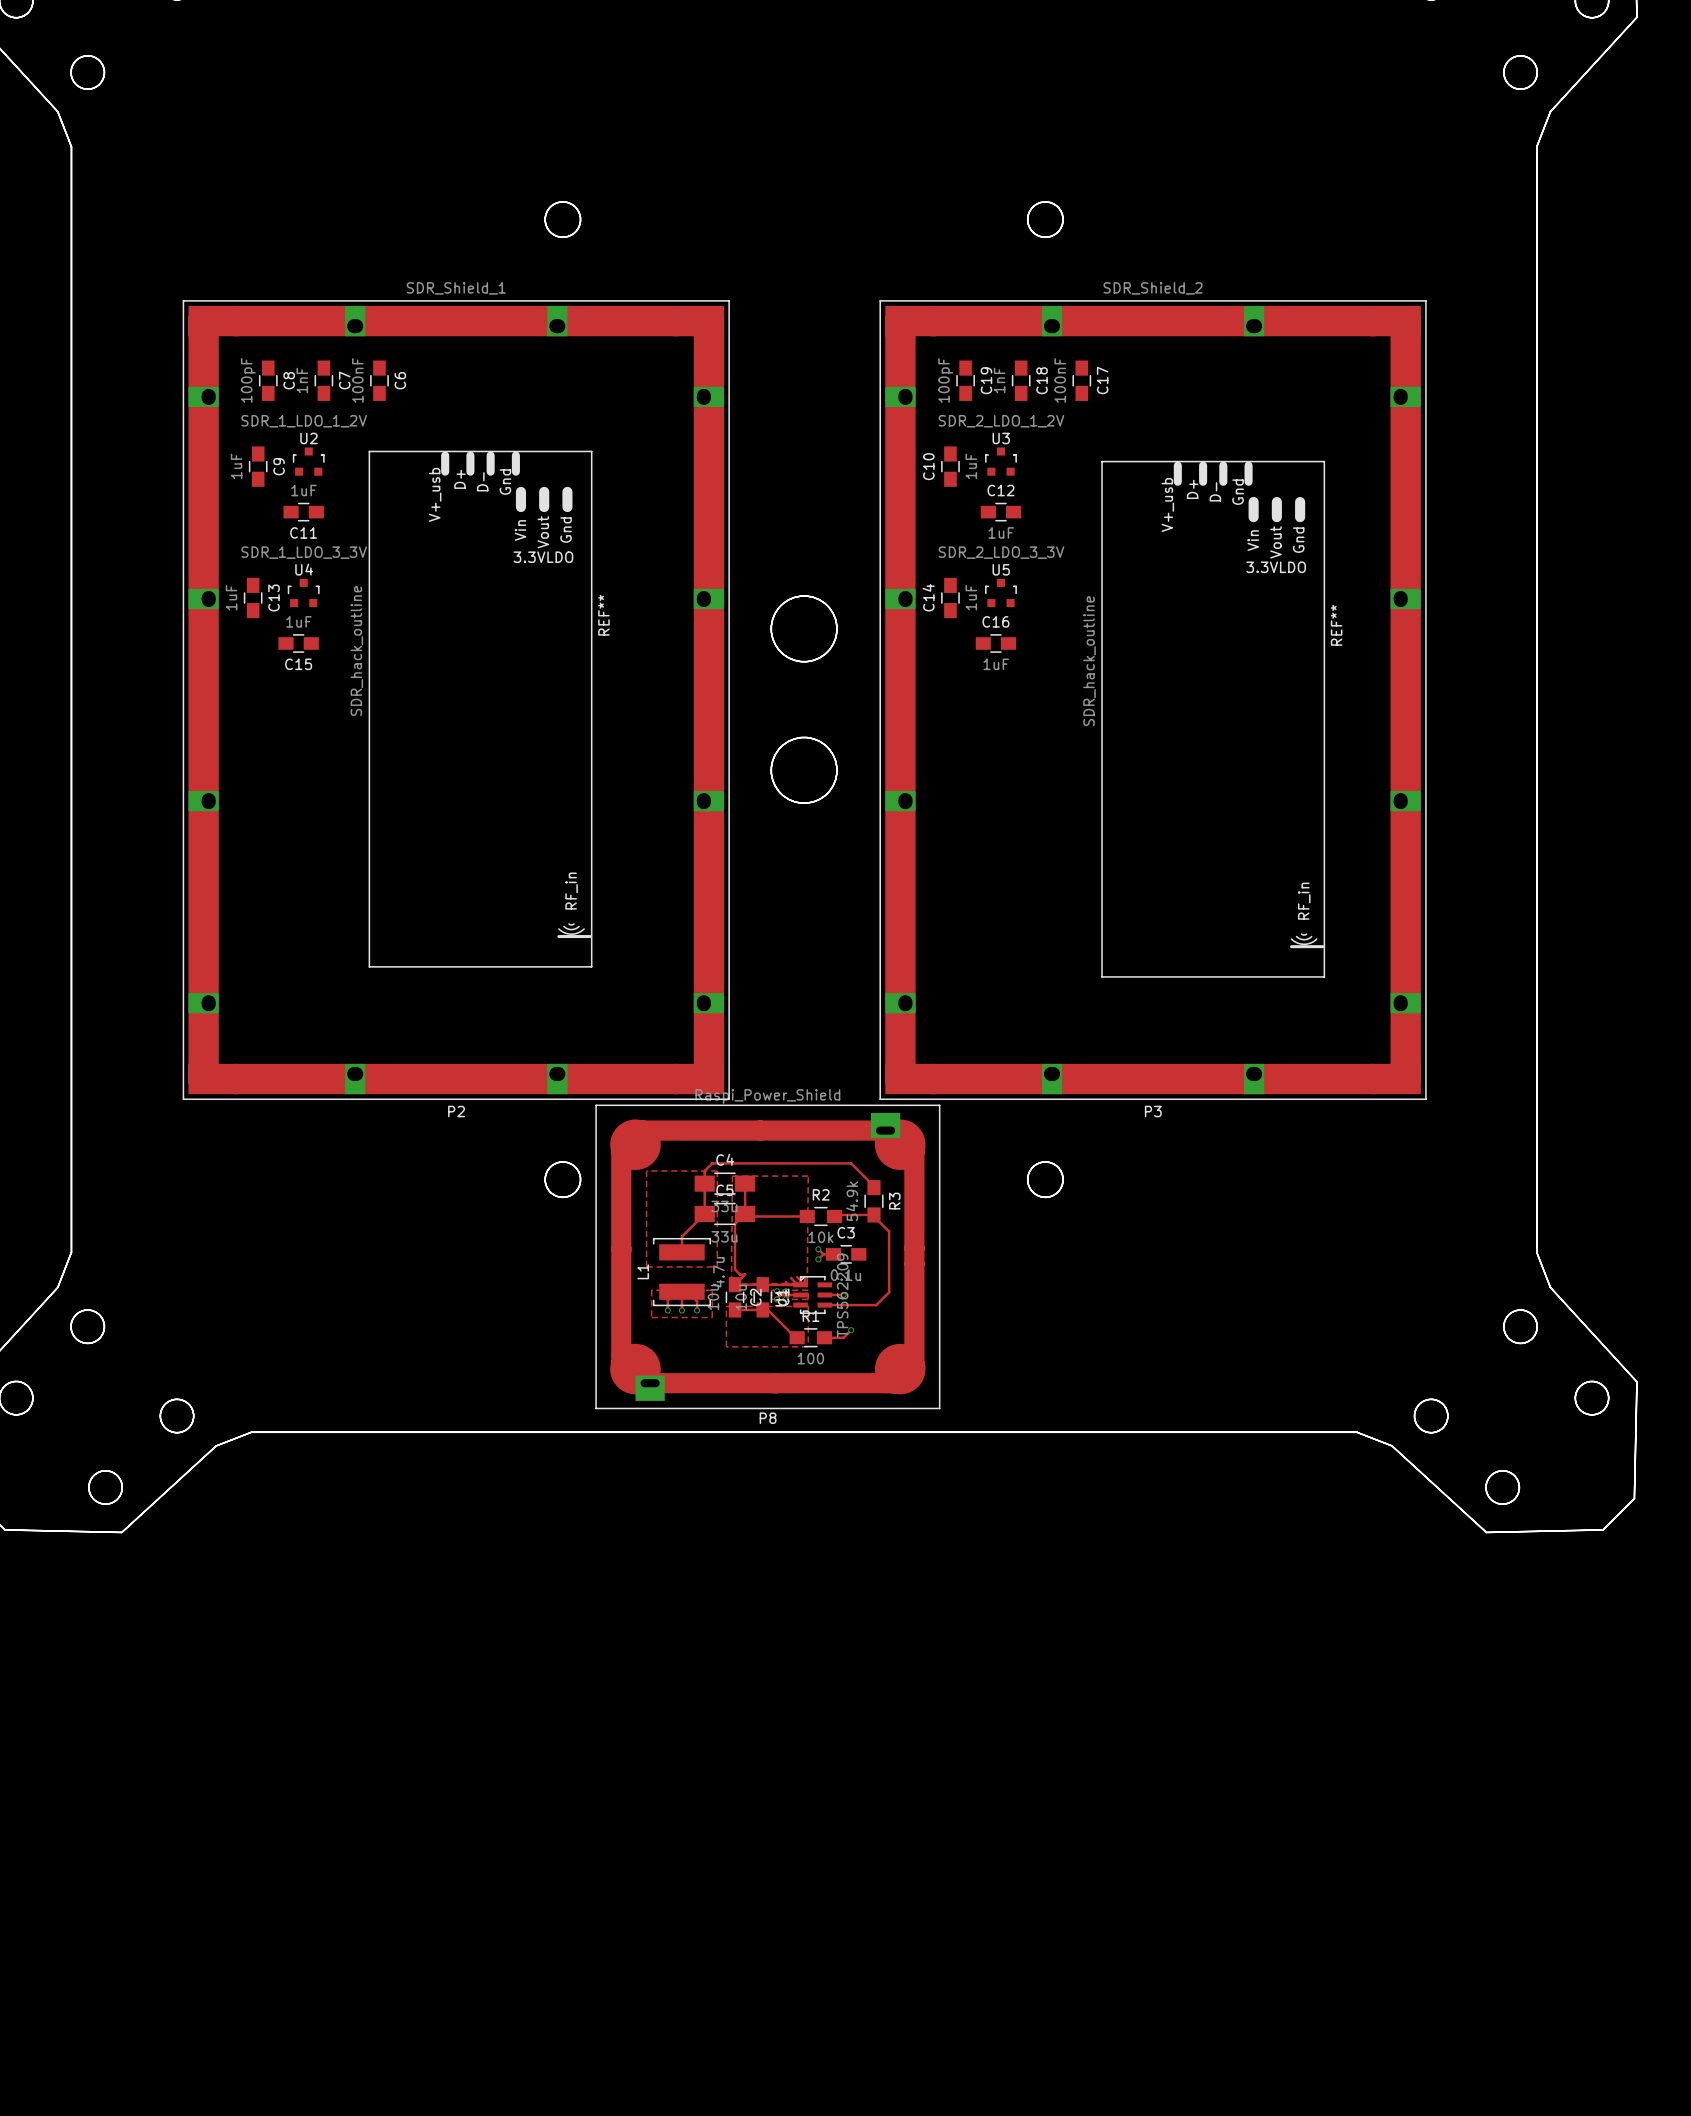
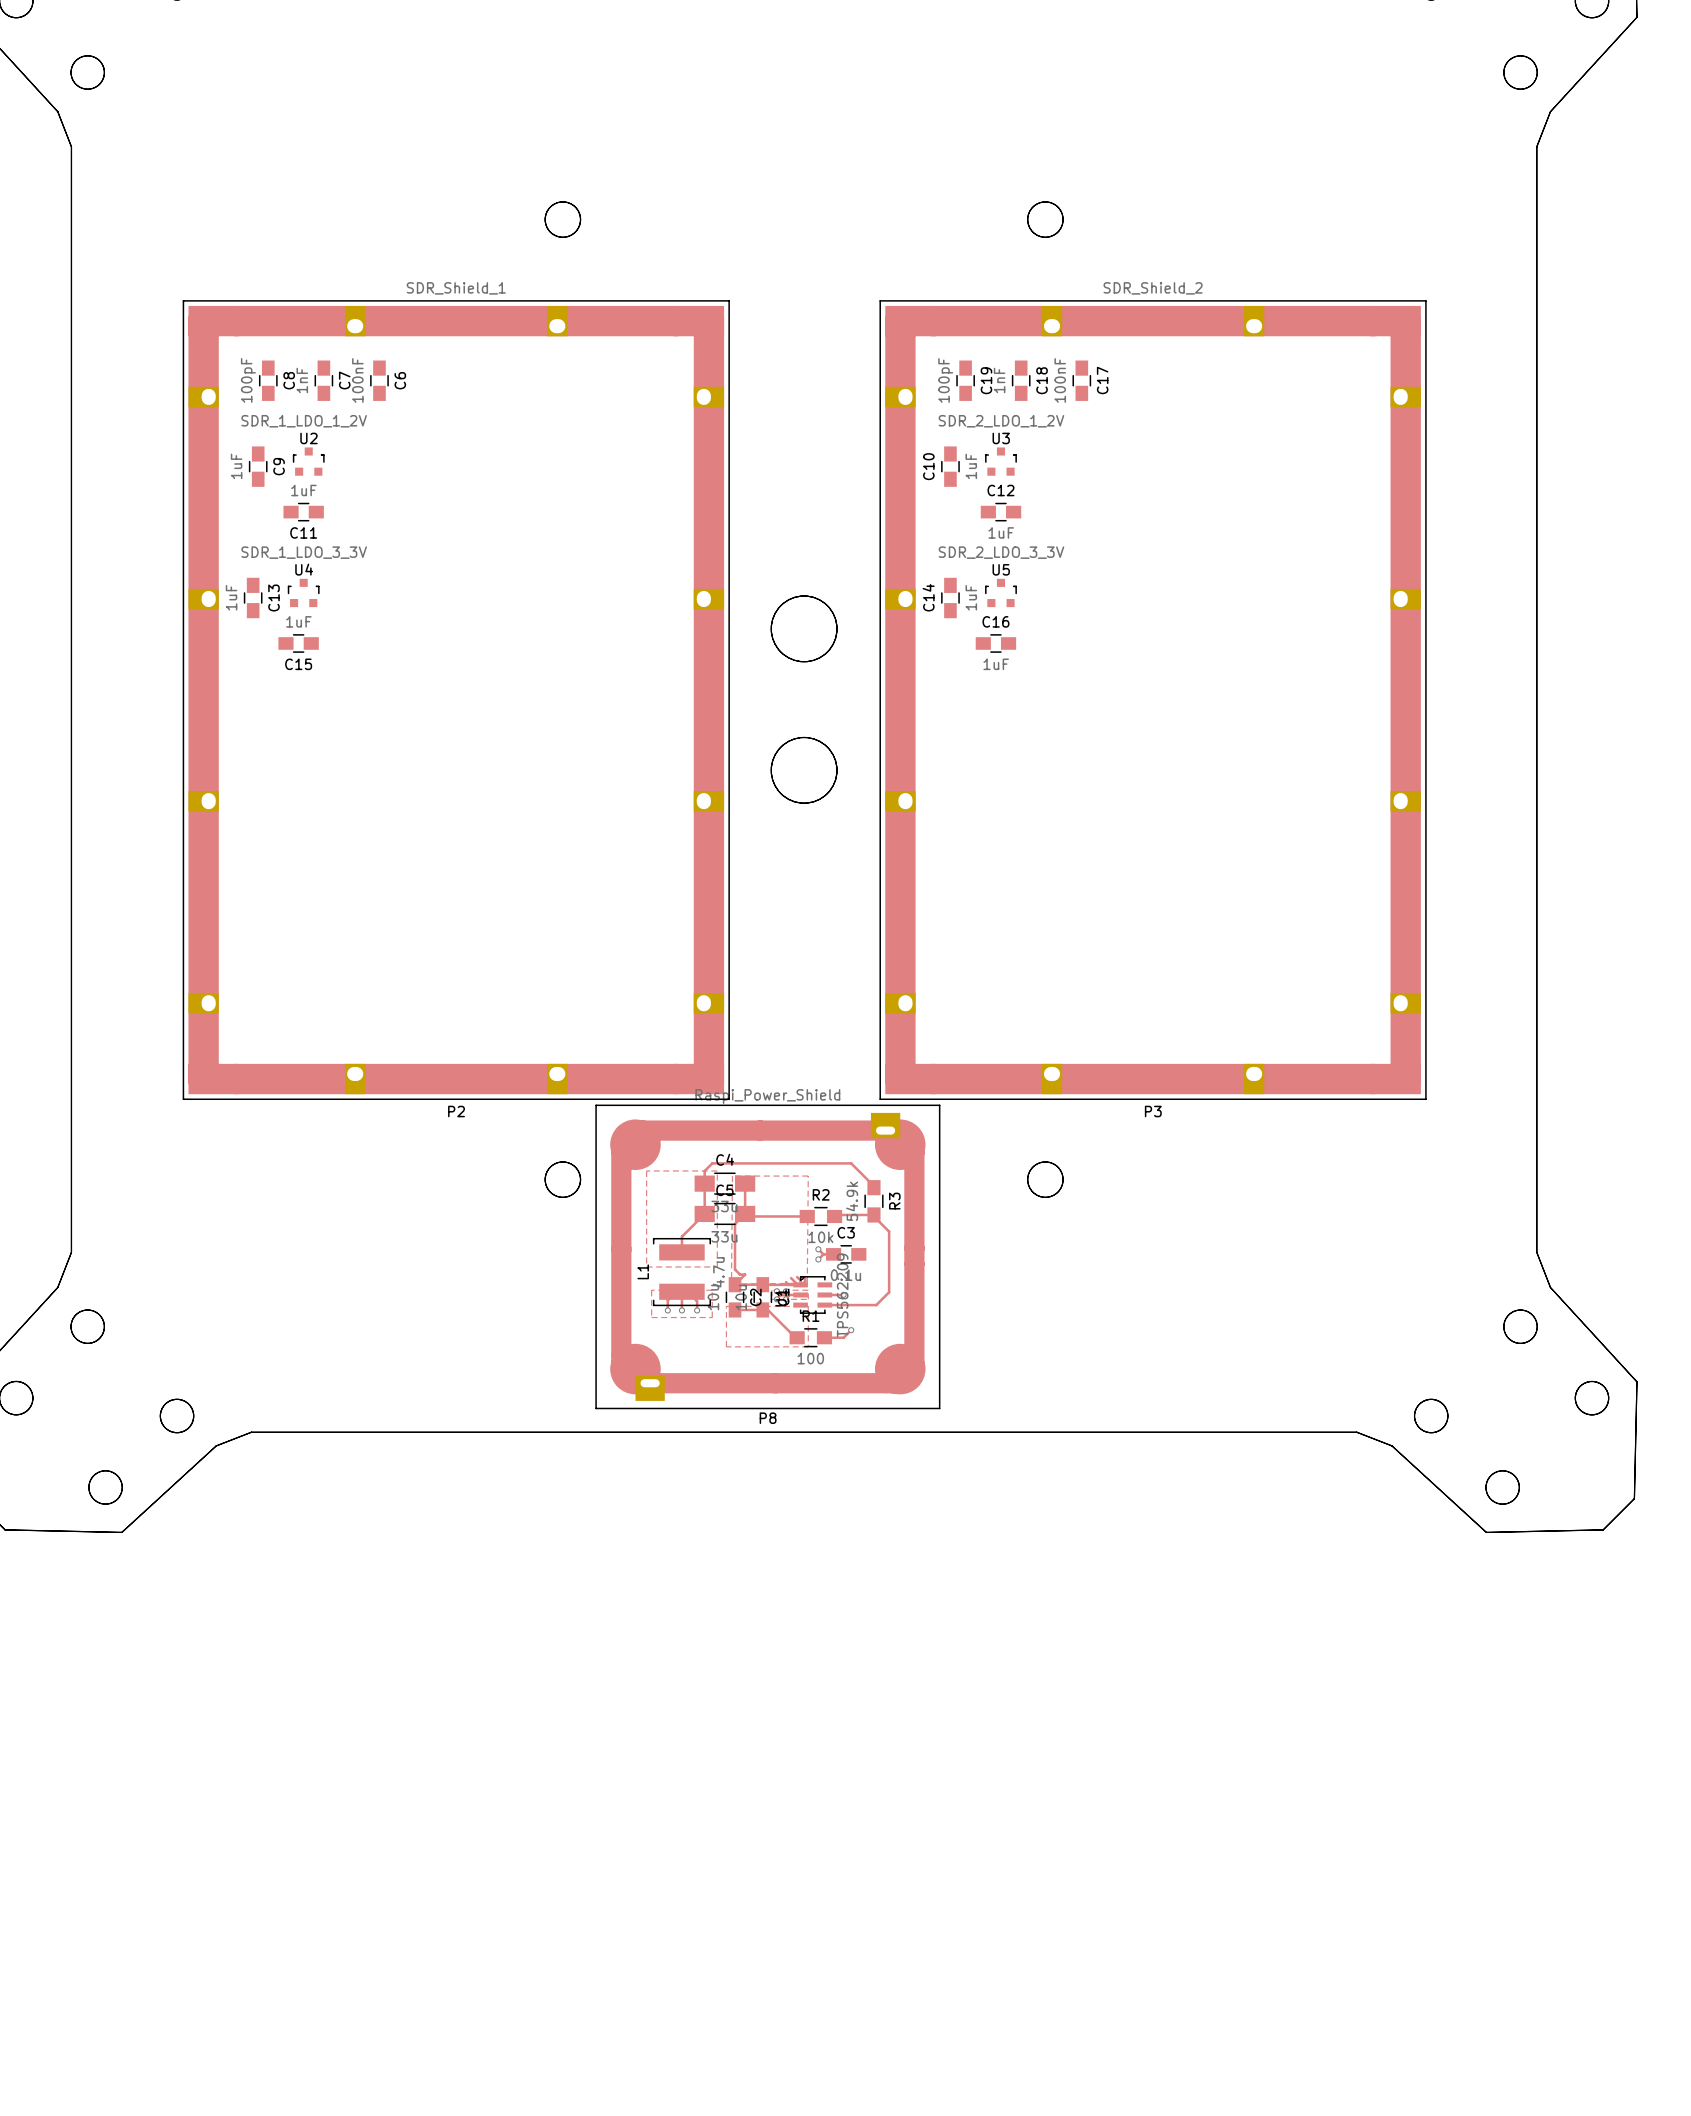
REF**: SDR_hack_outline (480, 709) -> none
REF**: SDR_hack_outline (1213, 719) -> none

